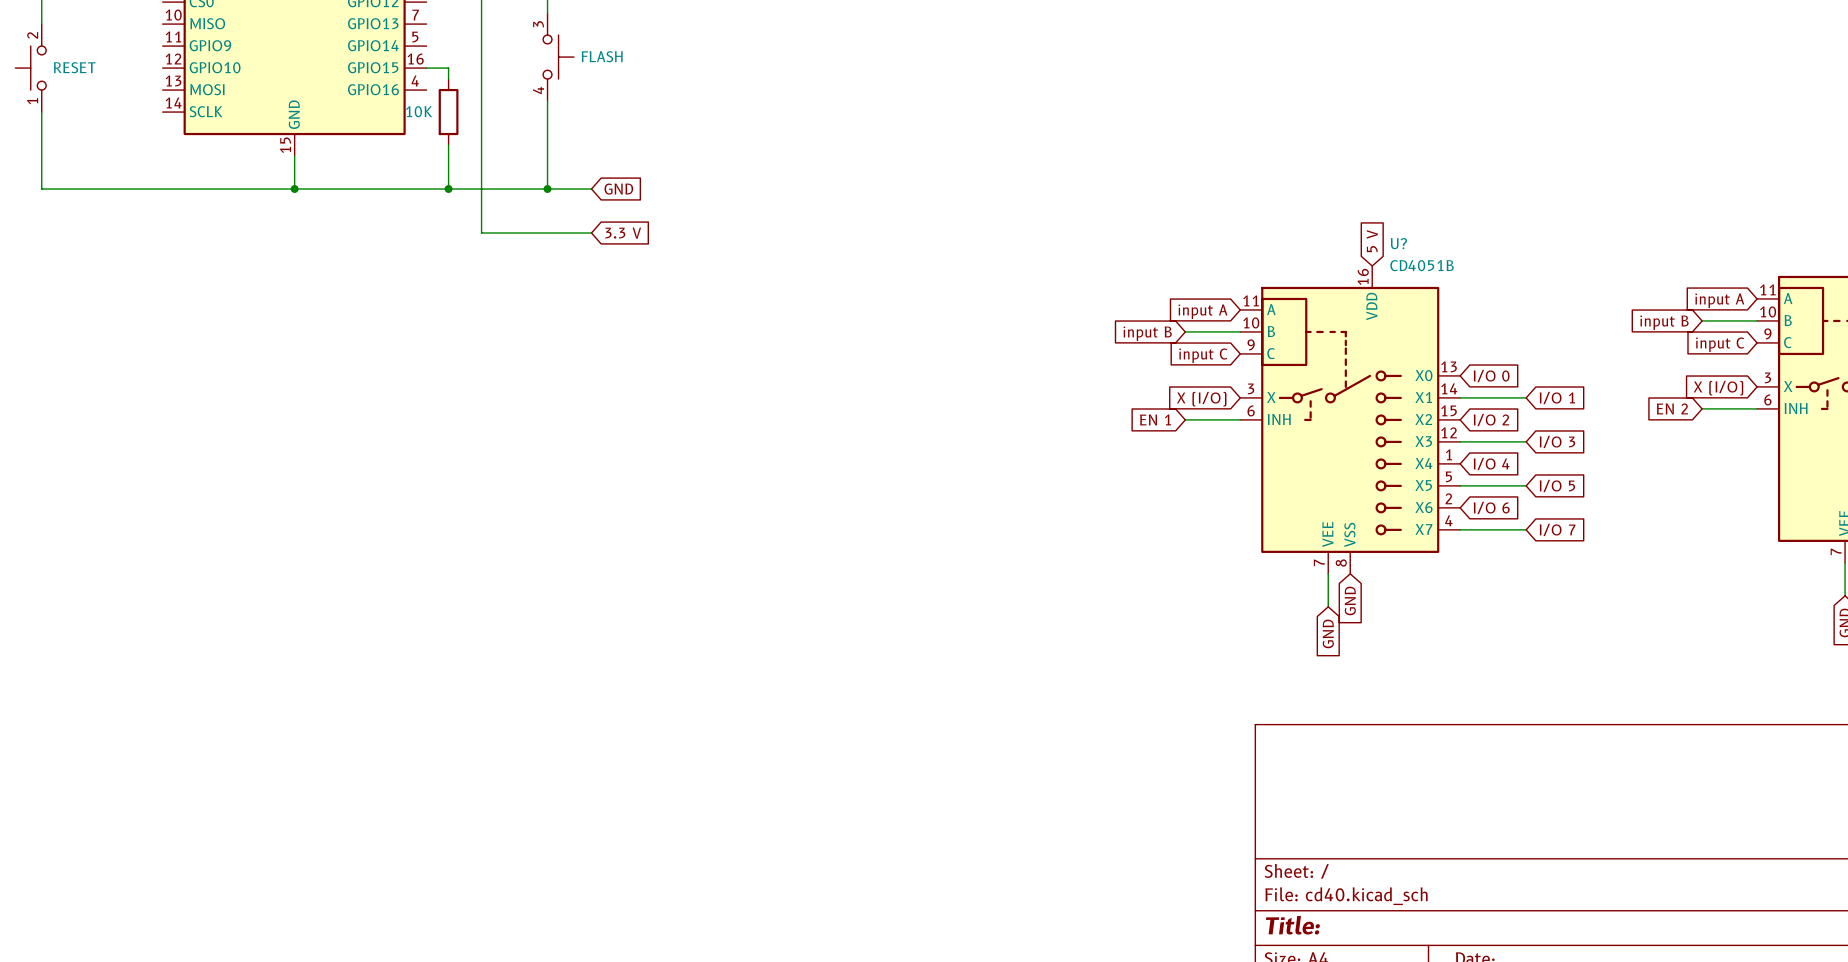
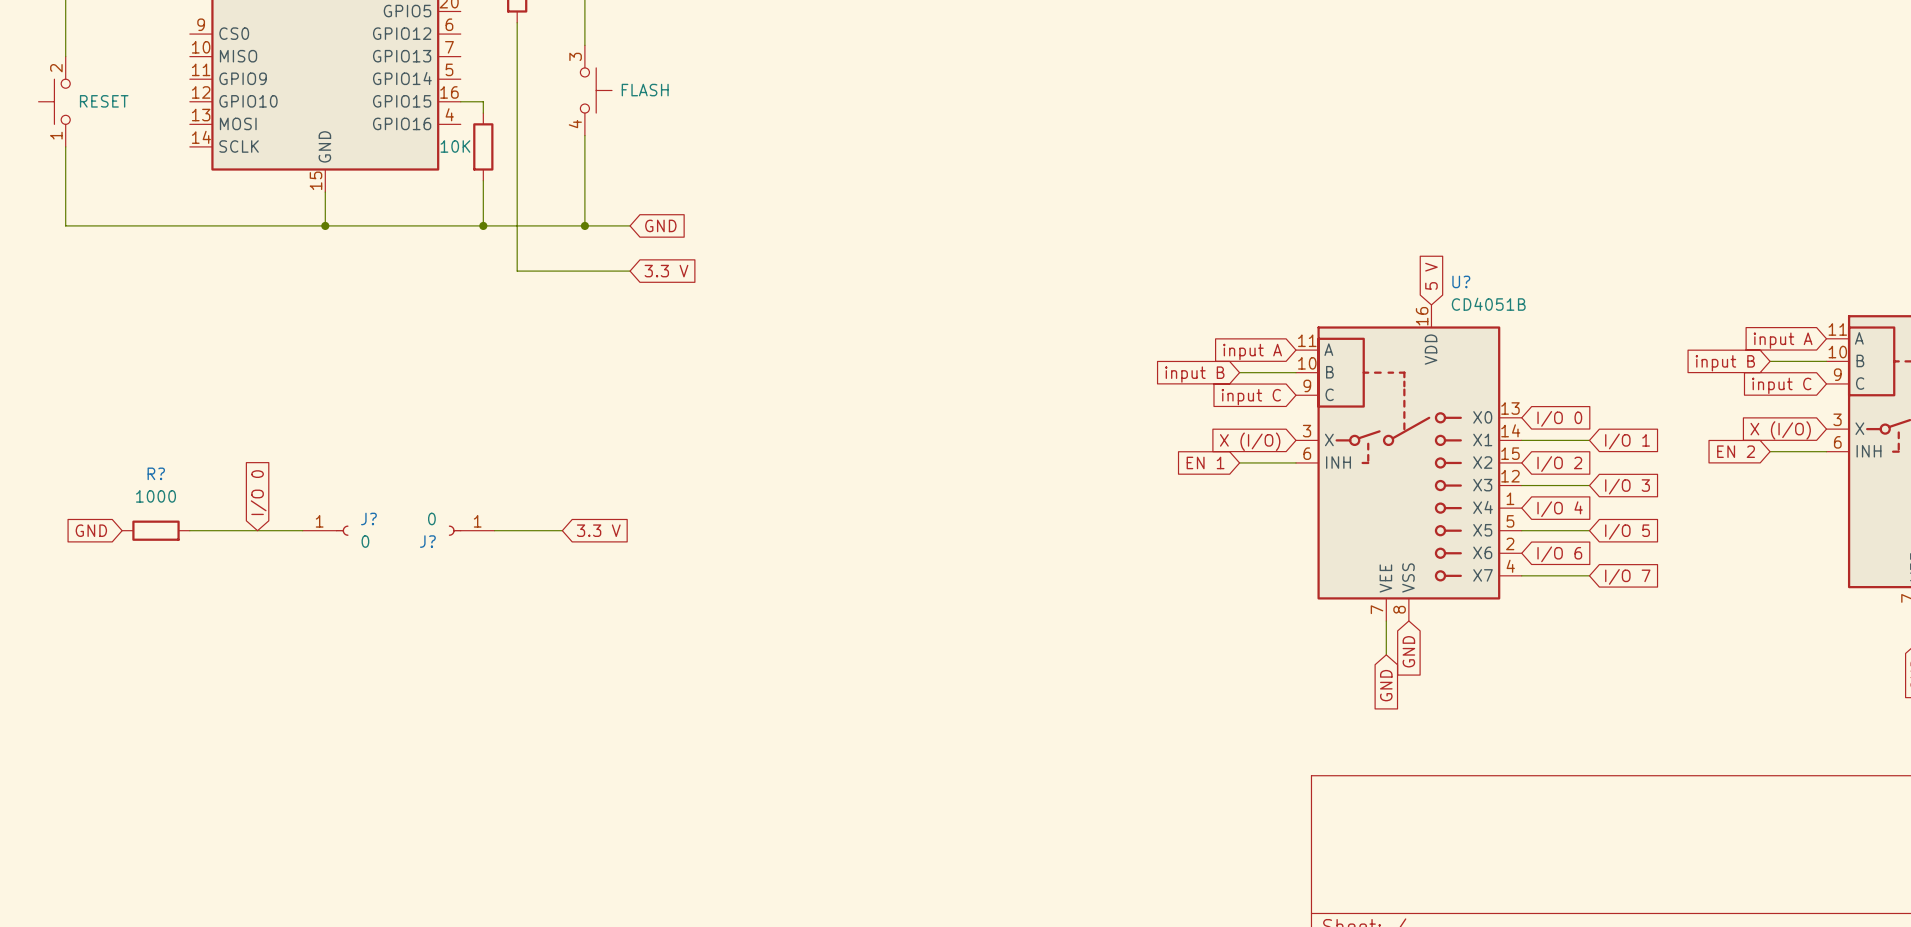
global label: none -> I/O 0 (258, 492)
global label: none -> GND (91, 530)
R?: none -> 1000 (155, 530)
wire: none -> (189, 530) (302, 530)
J?: none -> 0 (325, 530)
J?: none -> 0 (471, 530)
wire: none -> (494, 530) (562, 530)
global label: none -> 3.3 V (598, 530)

